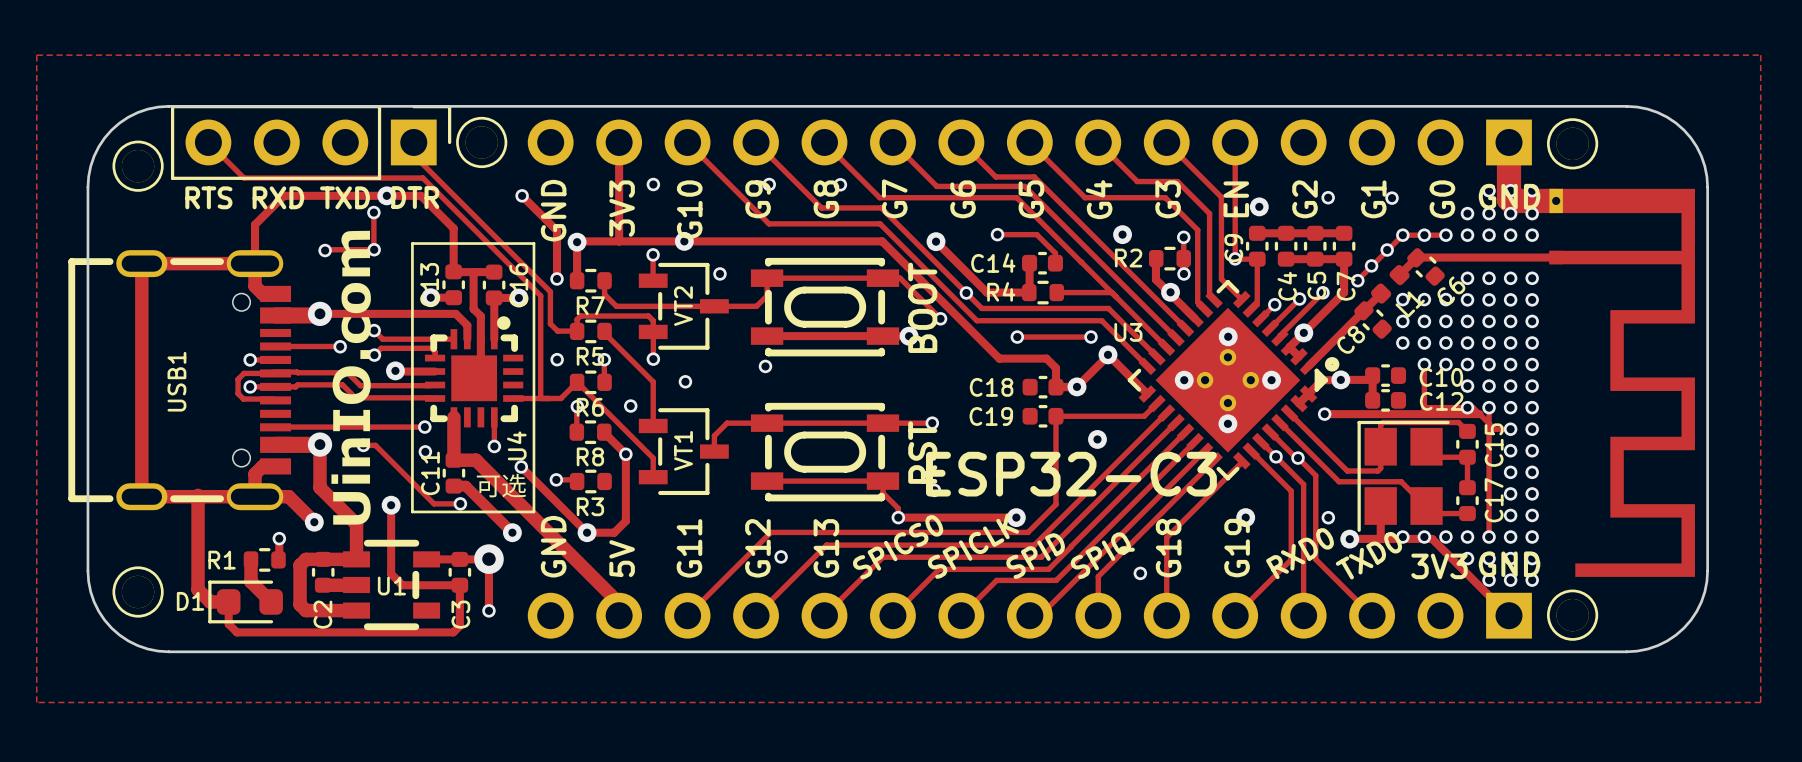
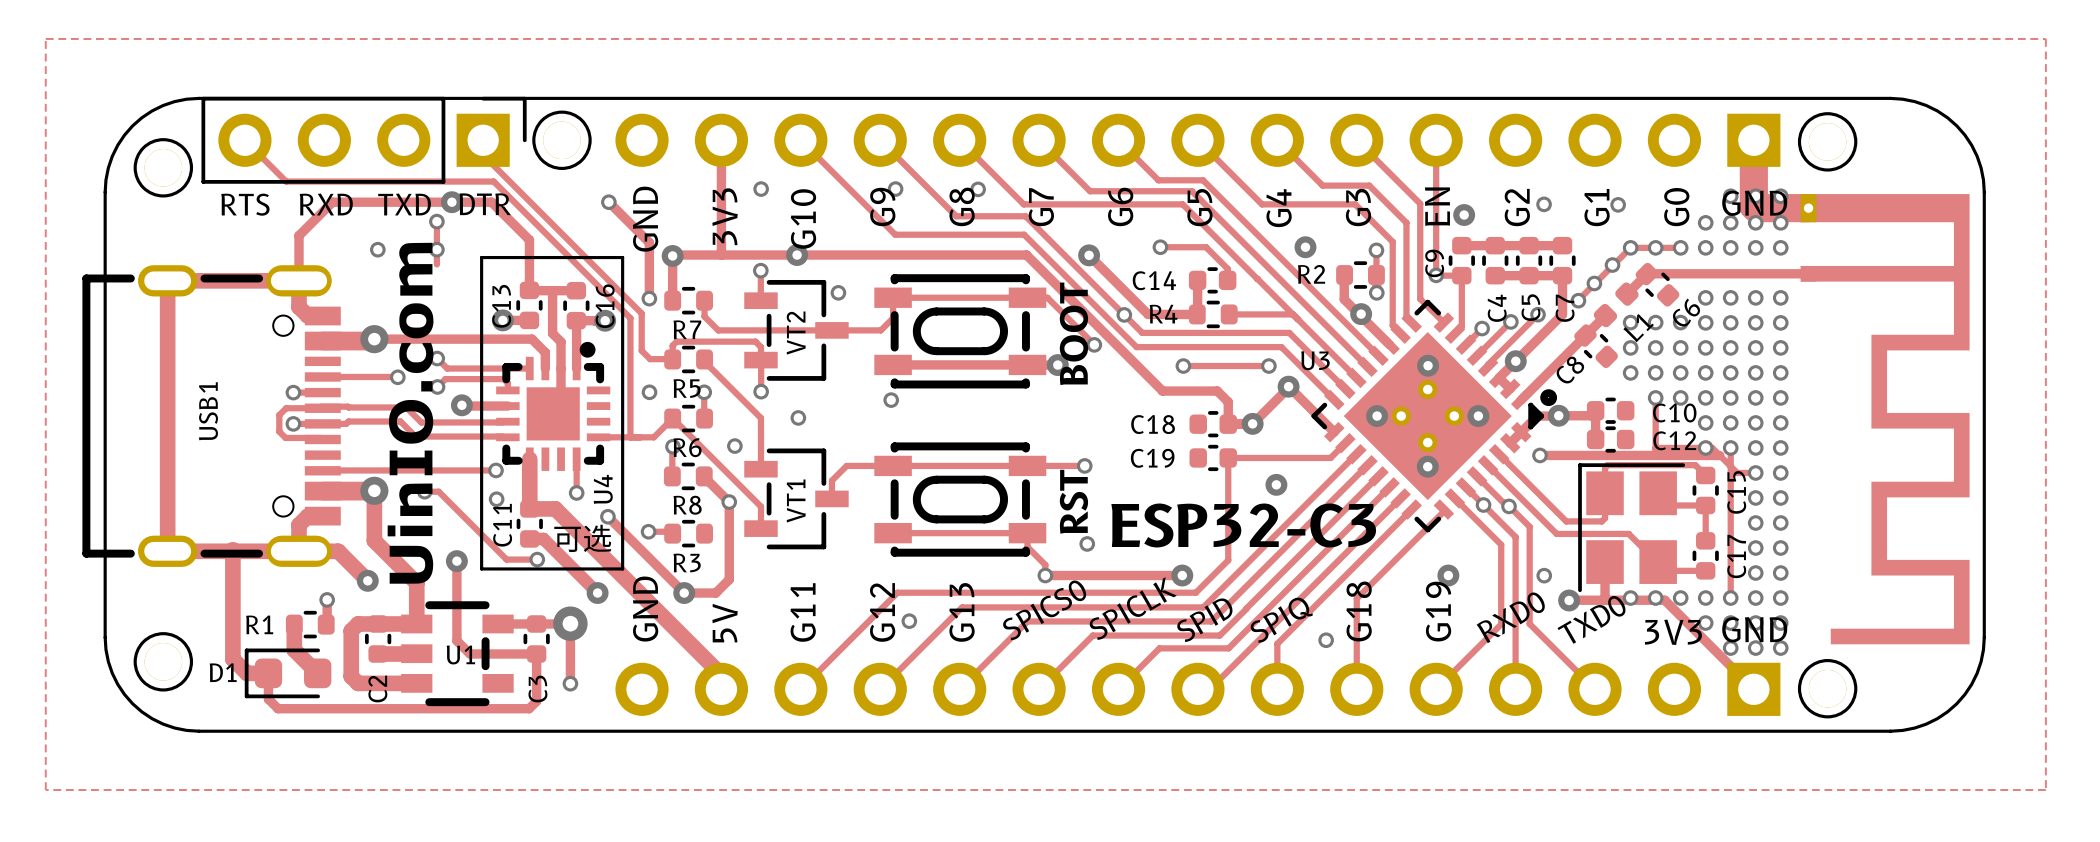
track: (374, 249) (325, 250) -> none
via position: (374, 249) -> (436, 249)
via position: (325, 250) -> (377, 249)

